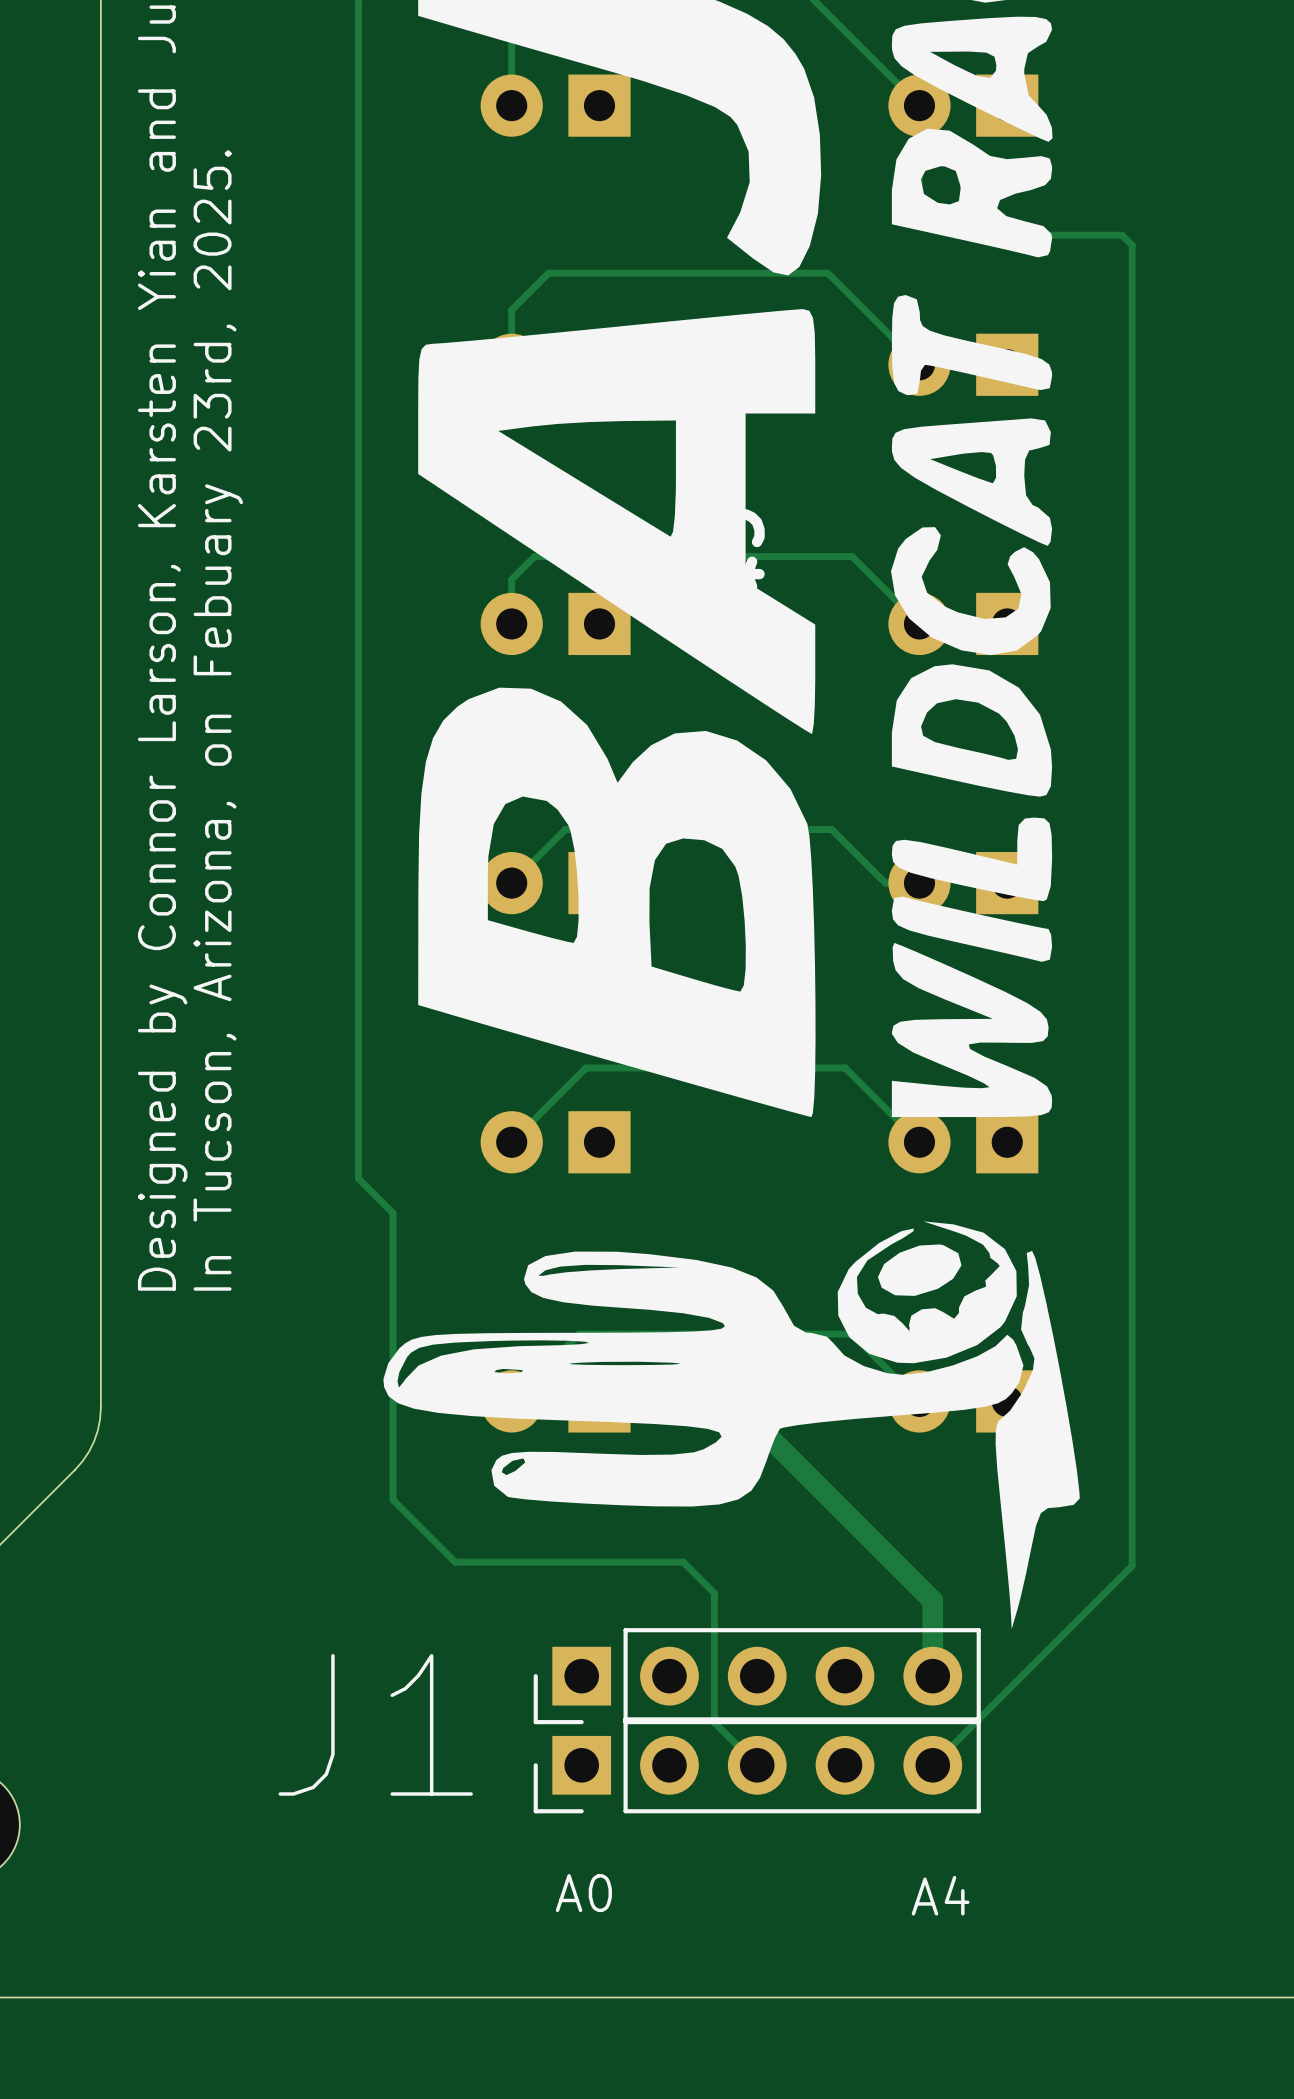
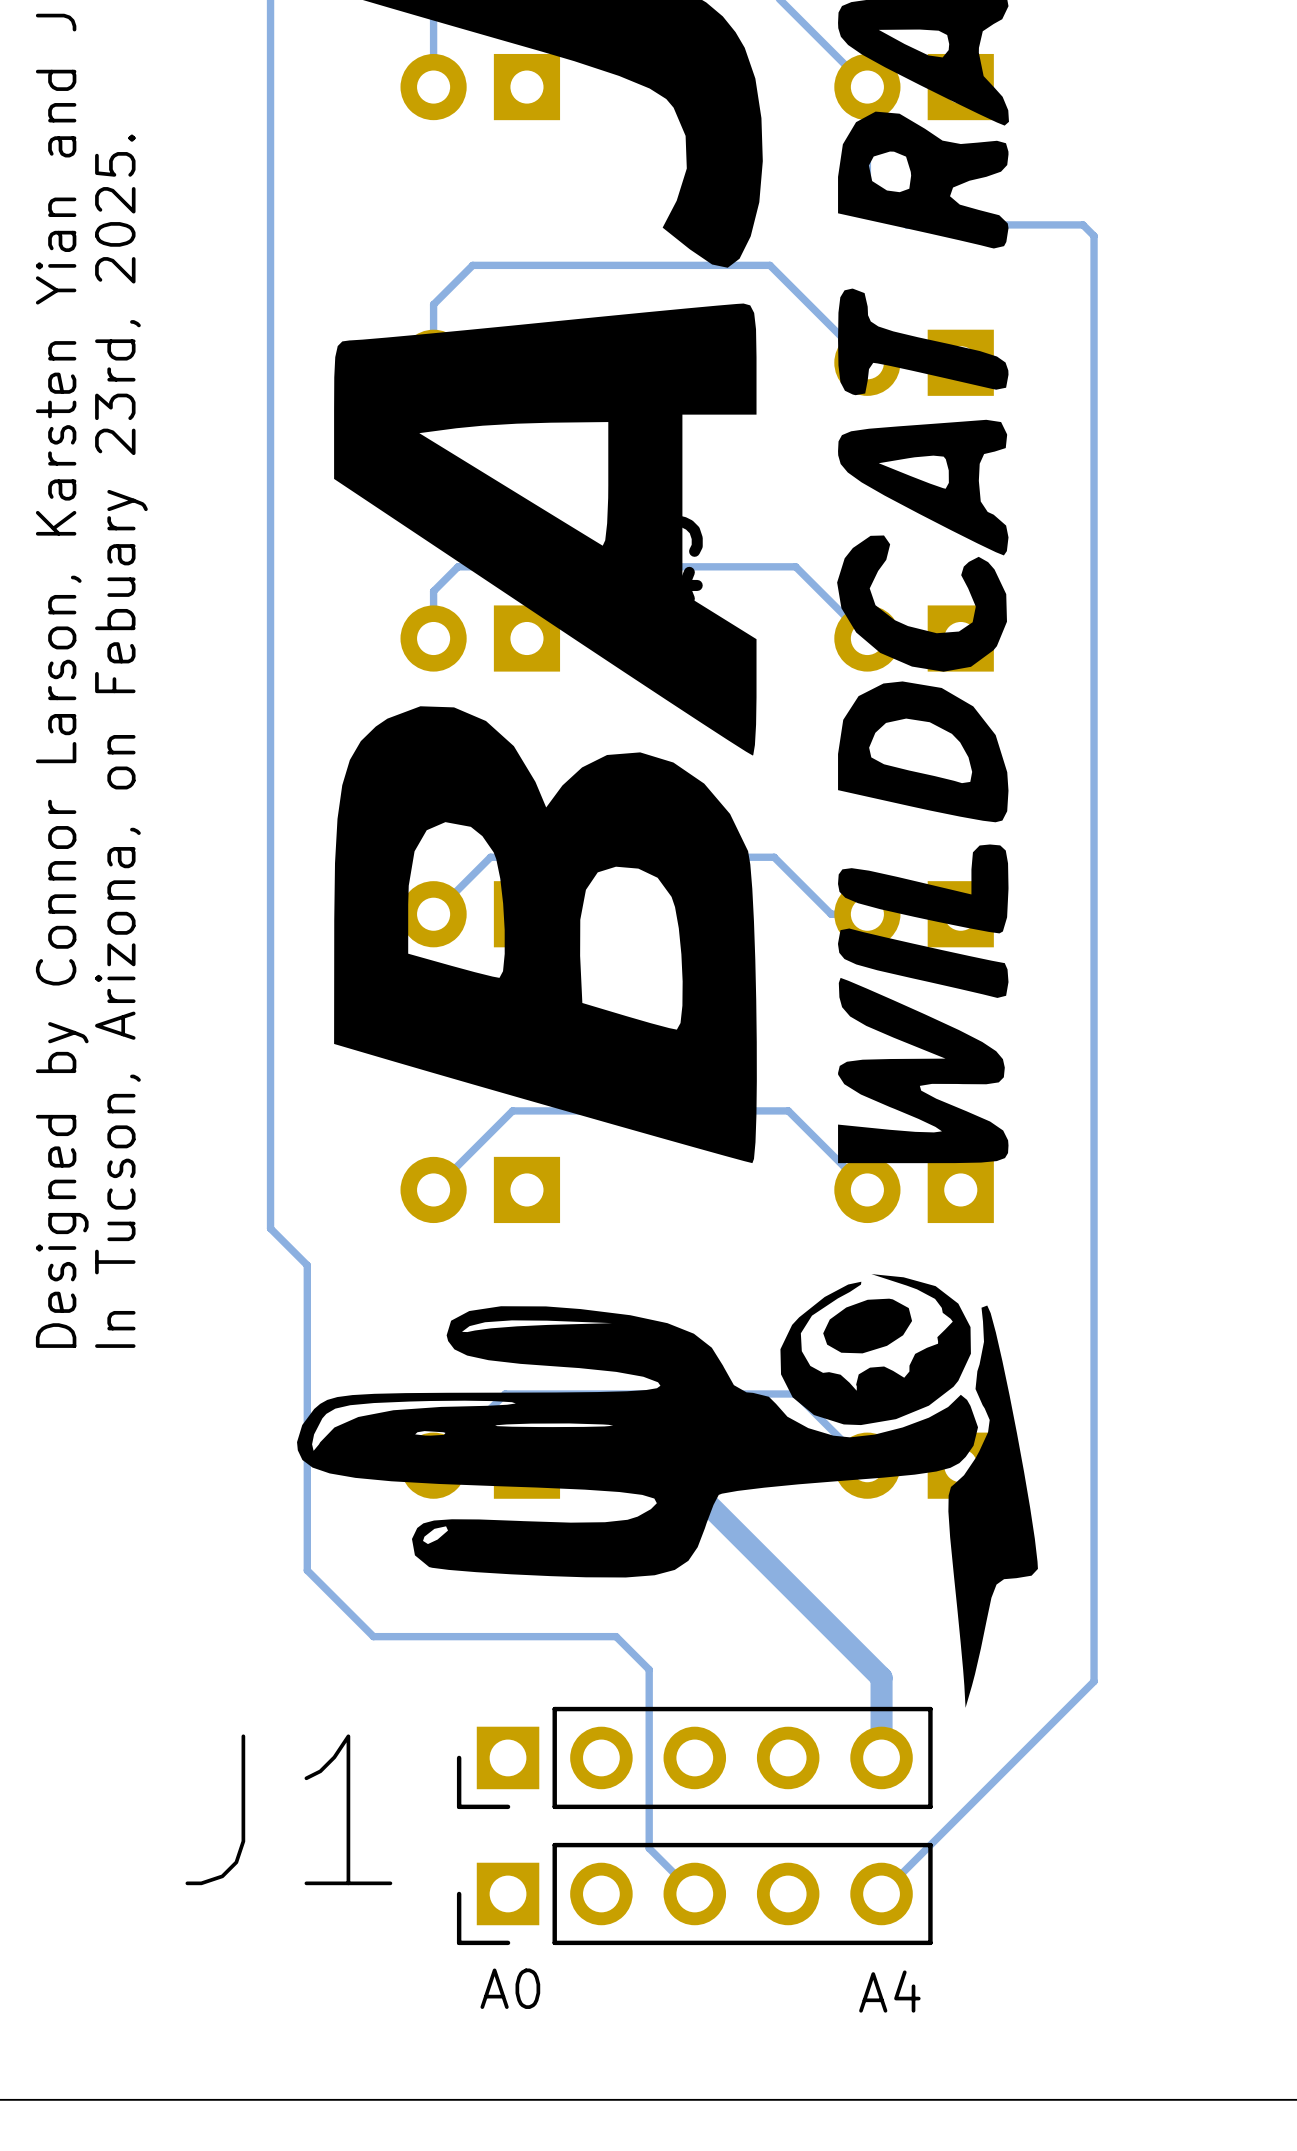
track: (1132, 245) (1132, 1565) (932, 1765) -> (1094, 235) (1094, 1681) (881, 1893)
track: (714, 1722) (757, 1765) -> (649, 1807) (649, 1848) (694, 1893)
part position: (757, 1765) -> (694, 1893)

